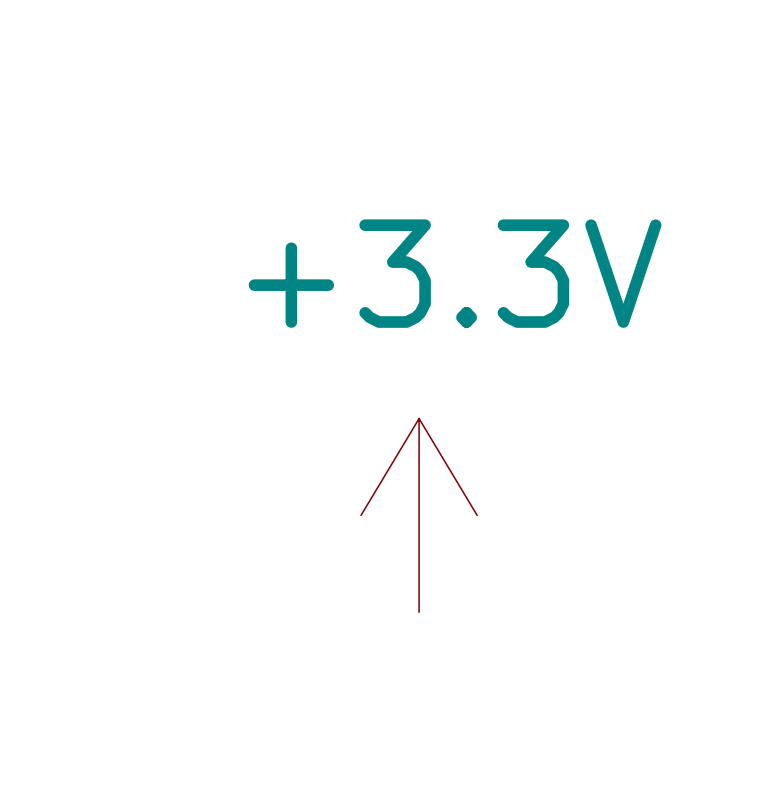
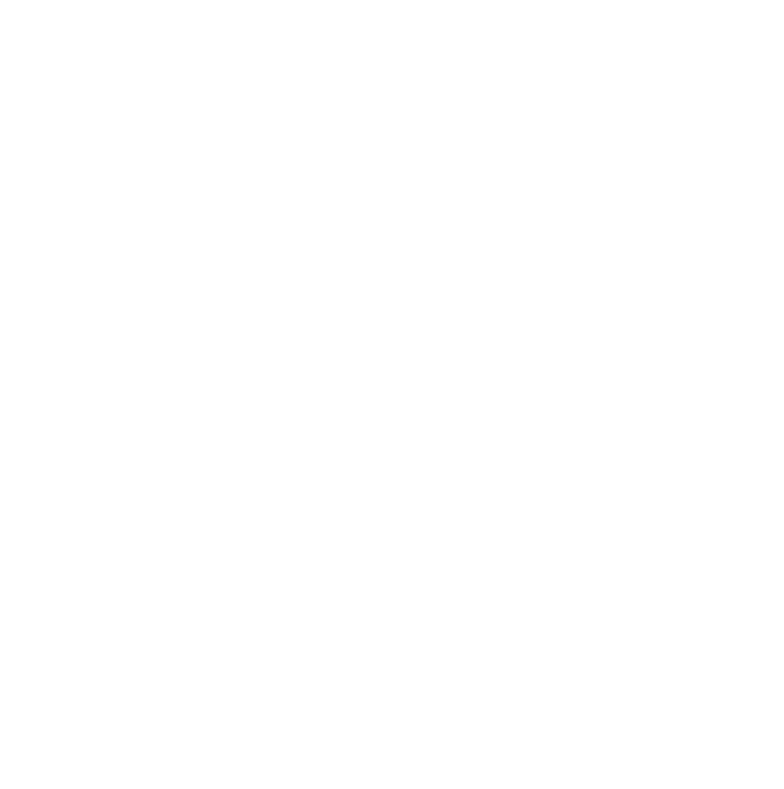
power symbol: +3.3V (419, 515) -> none

